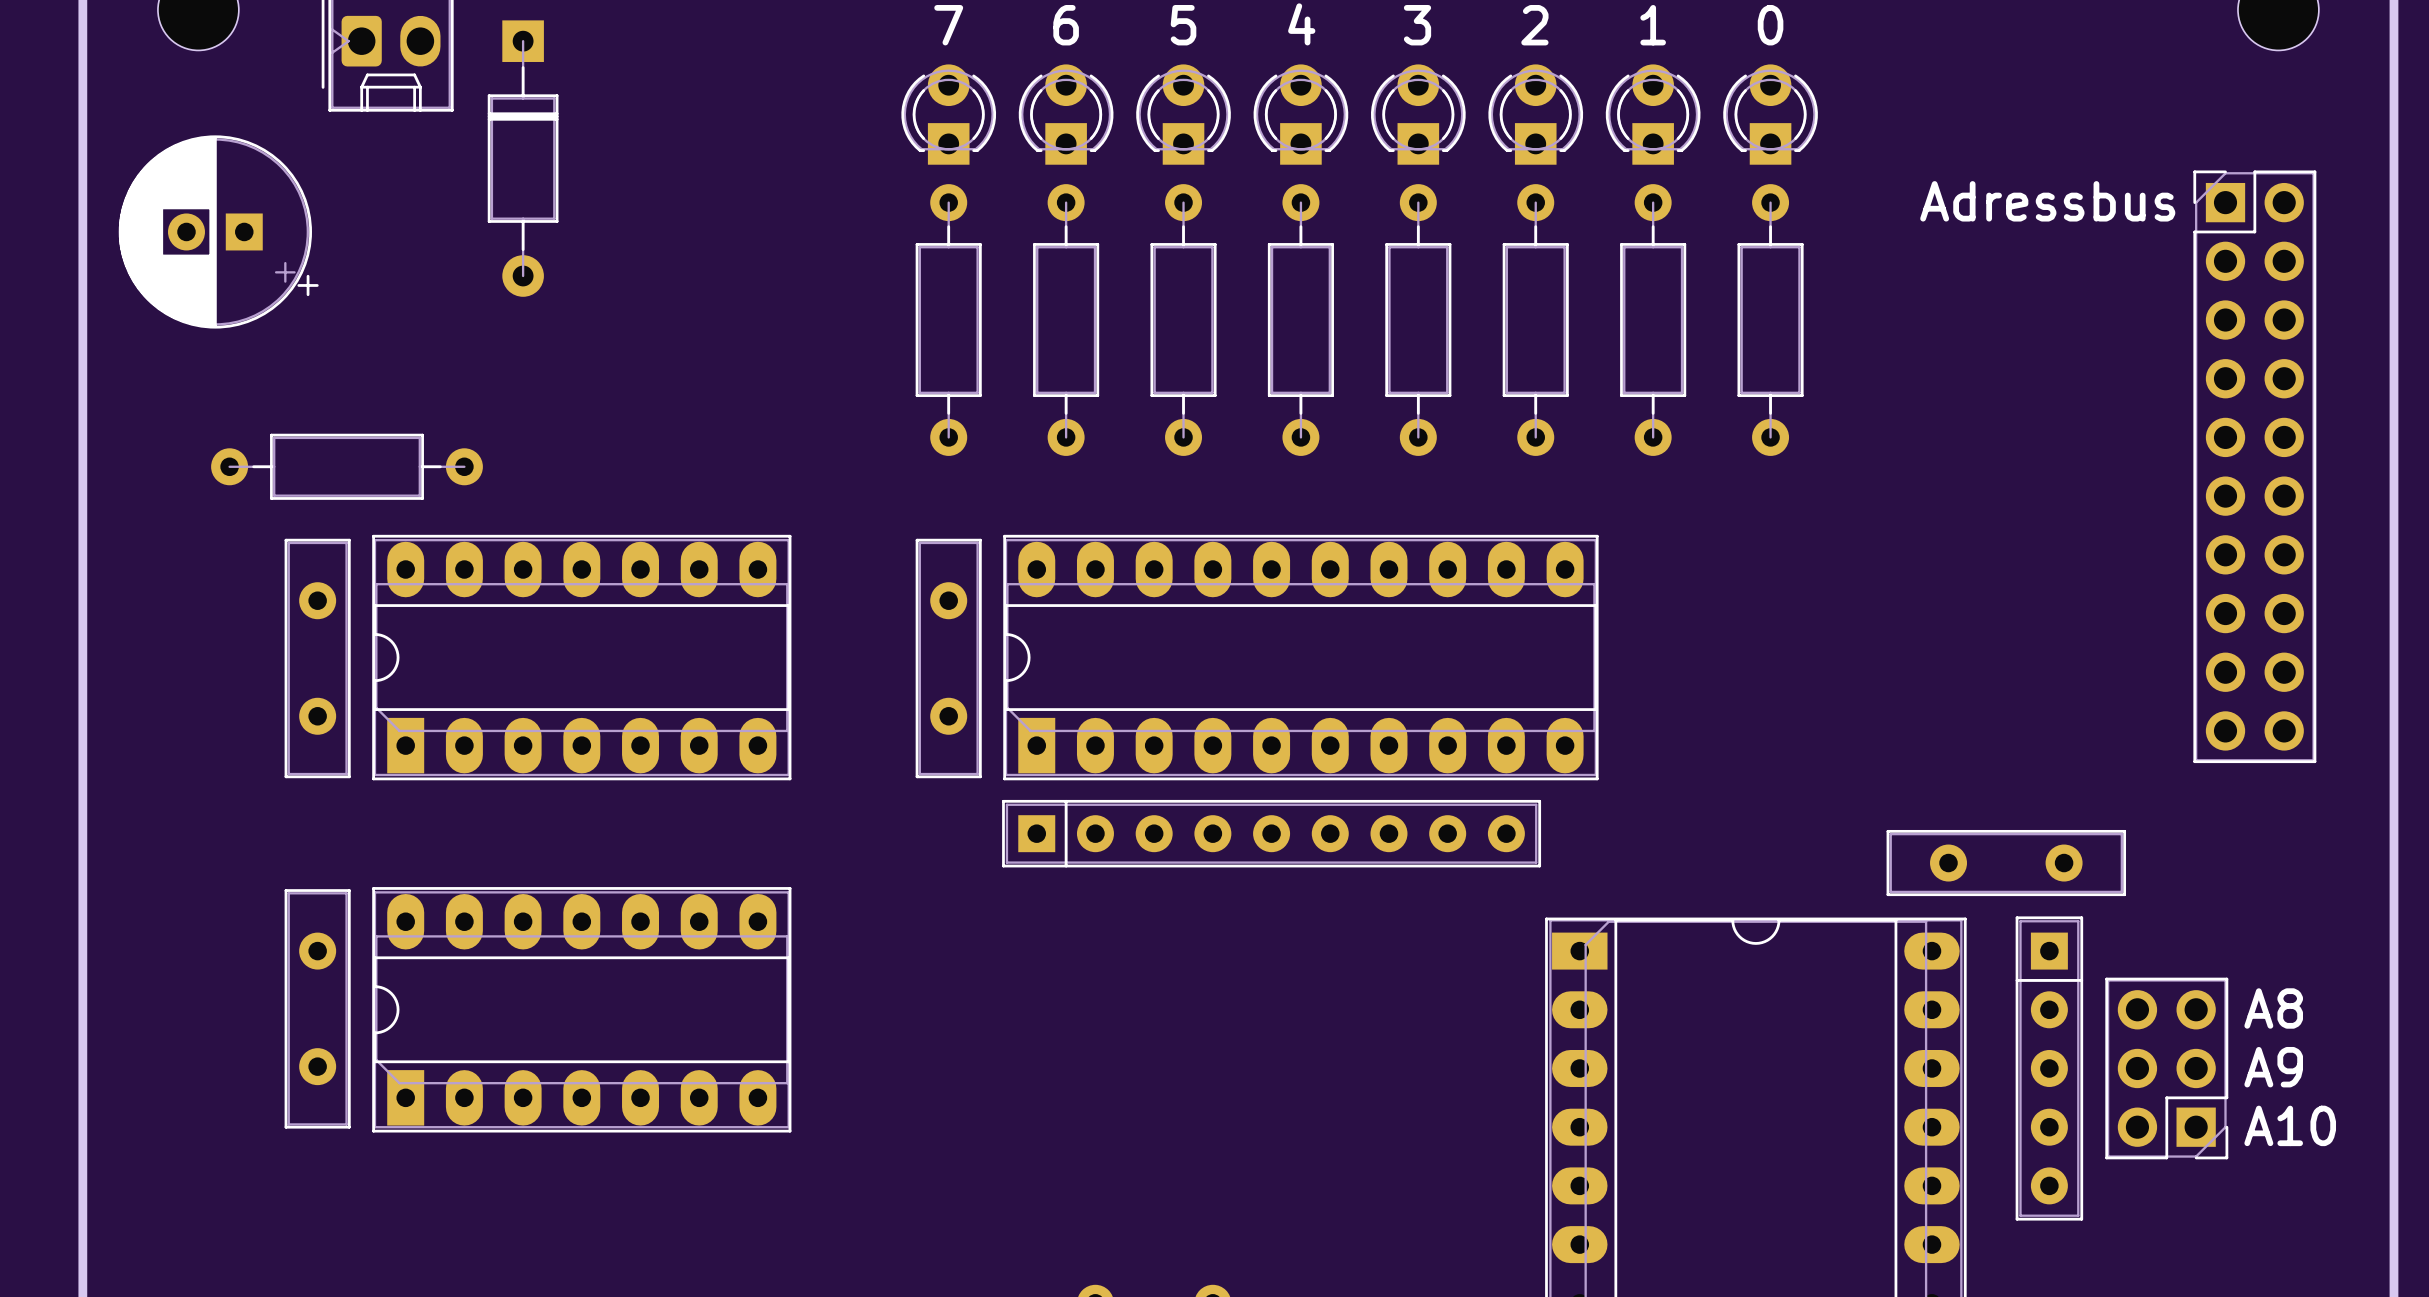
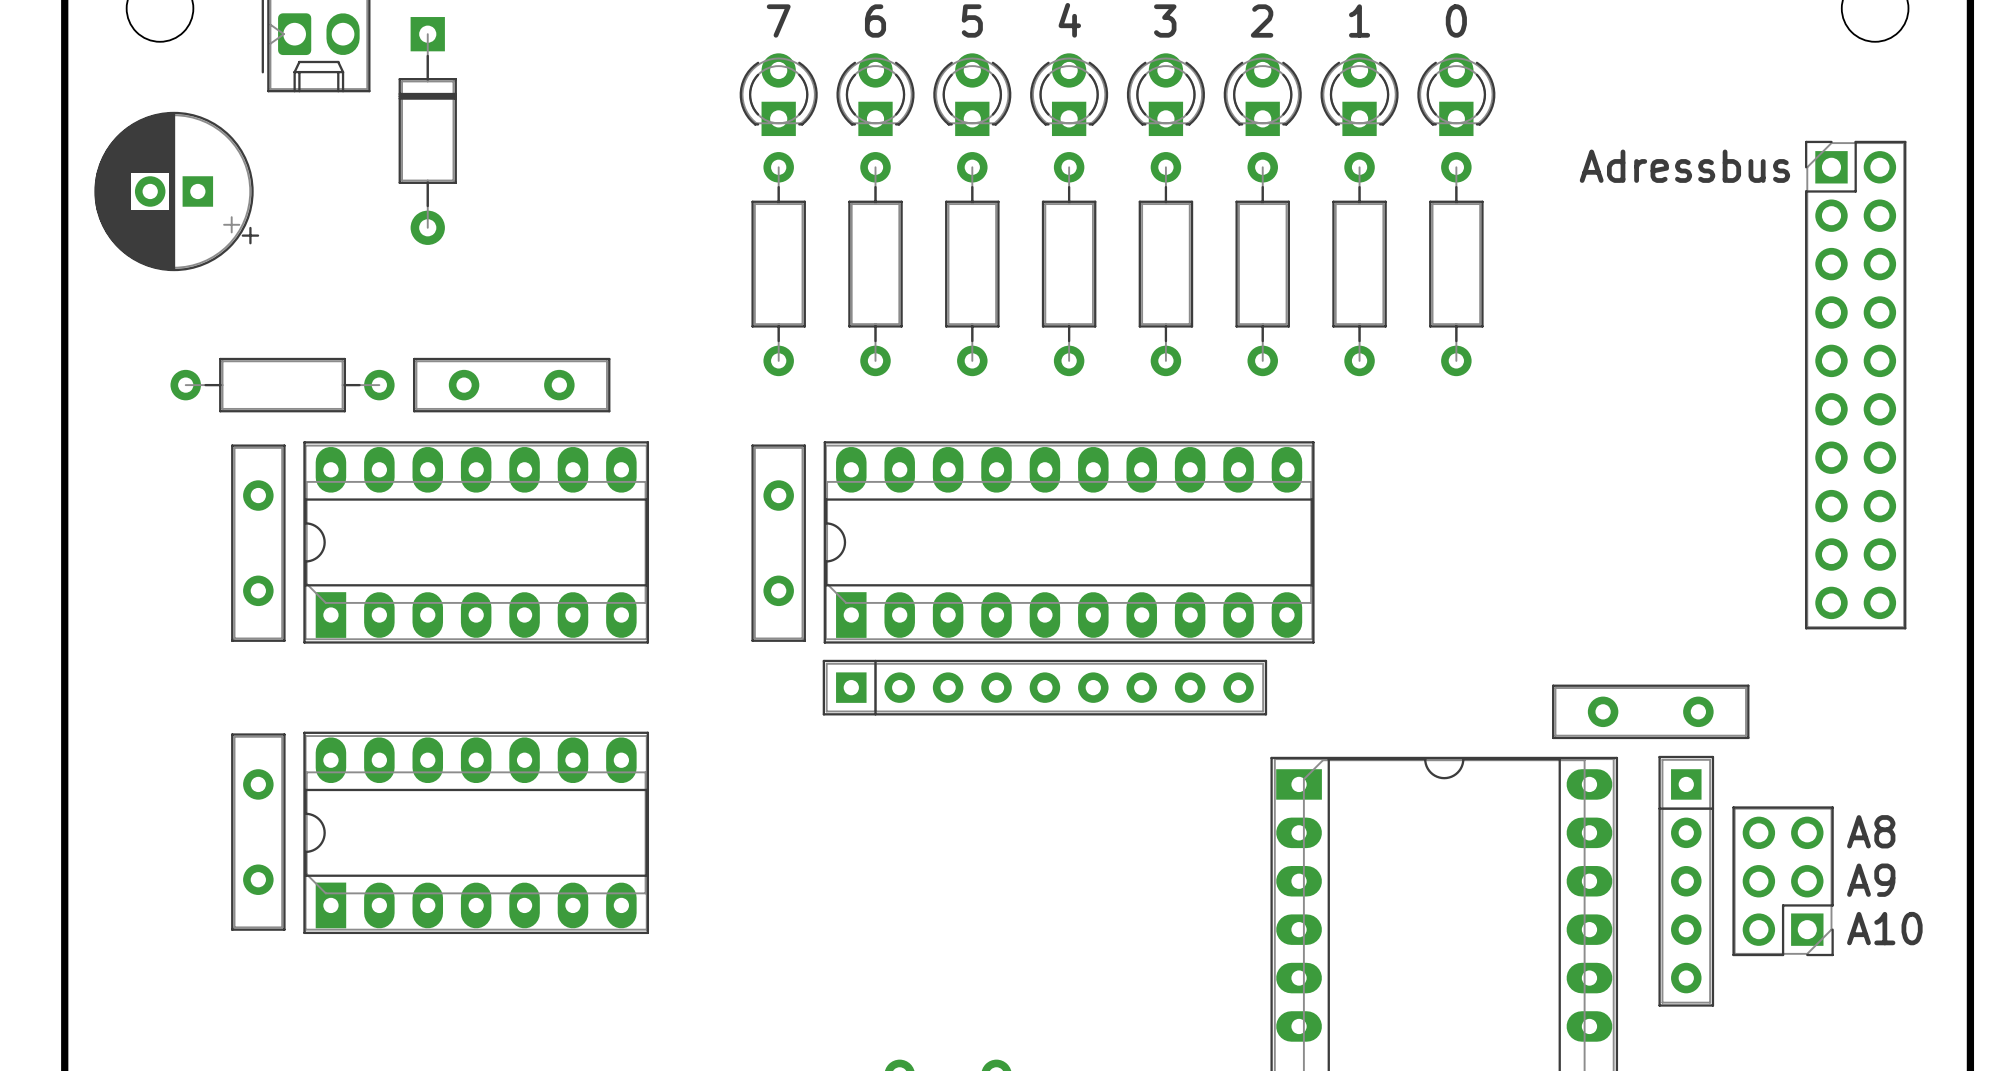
part: none -> (511, 385)

